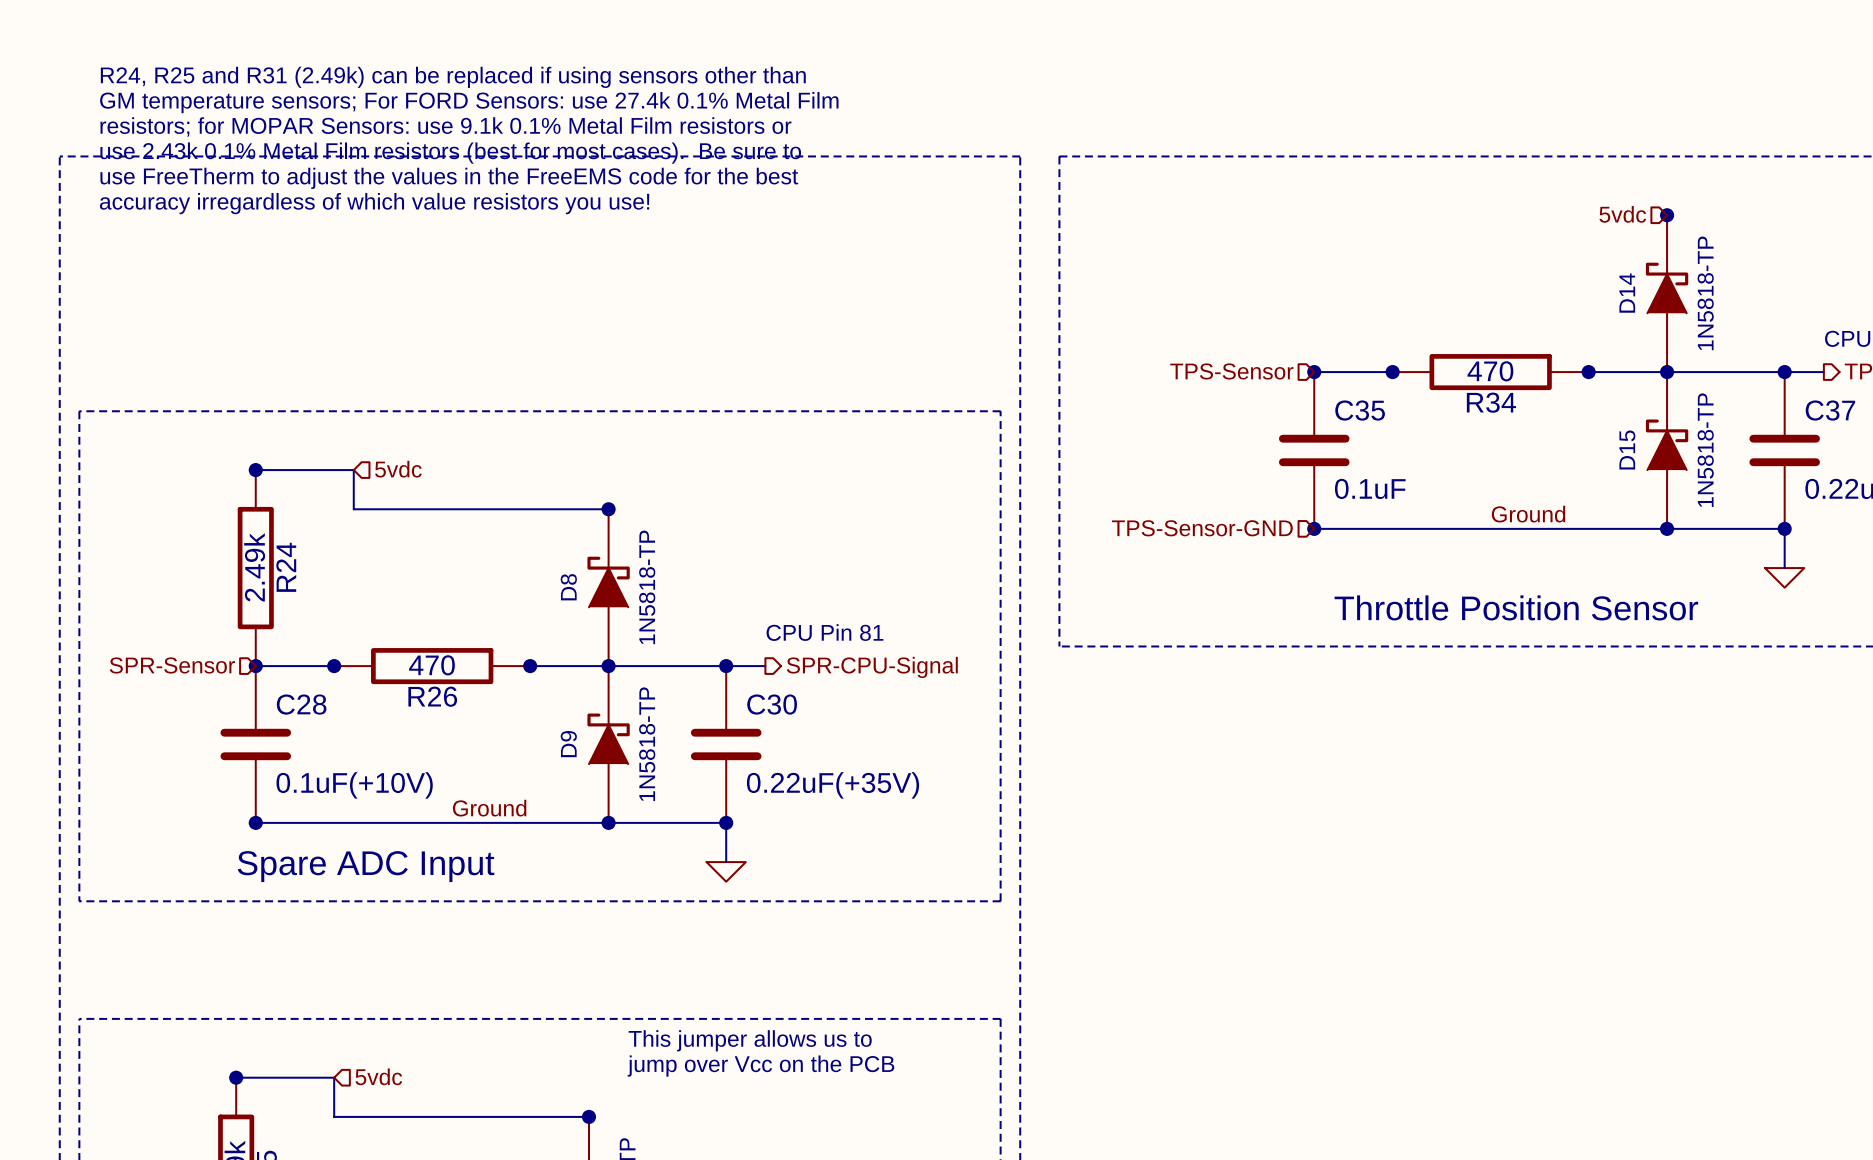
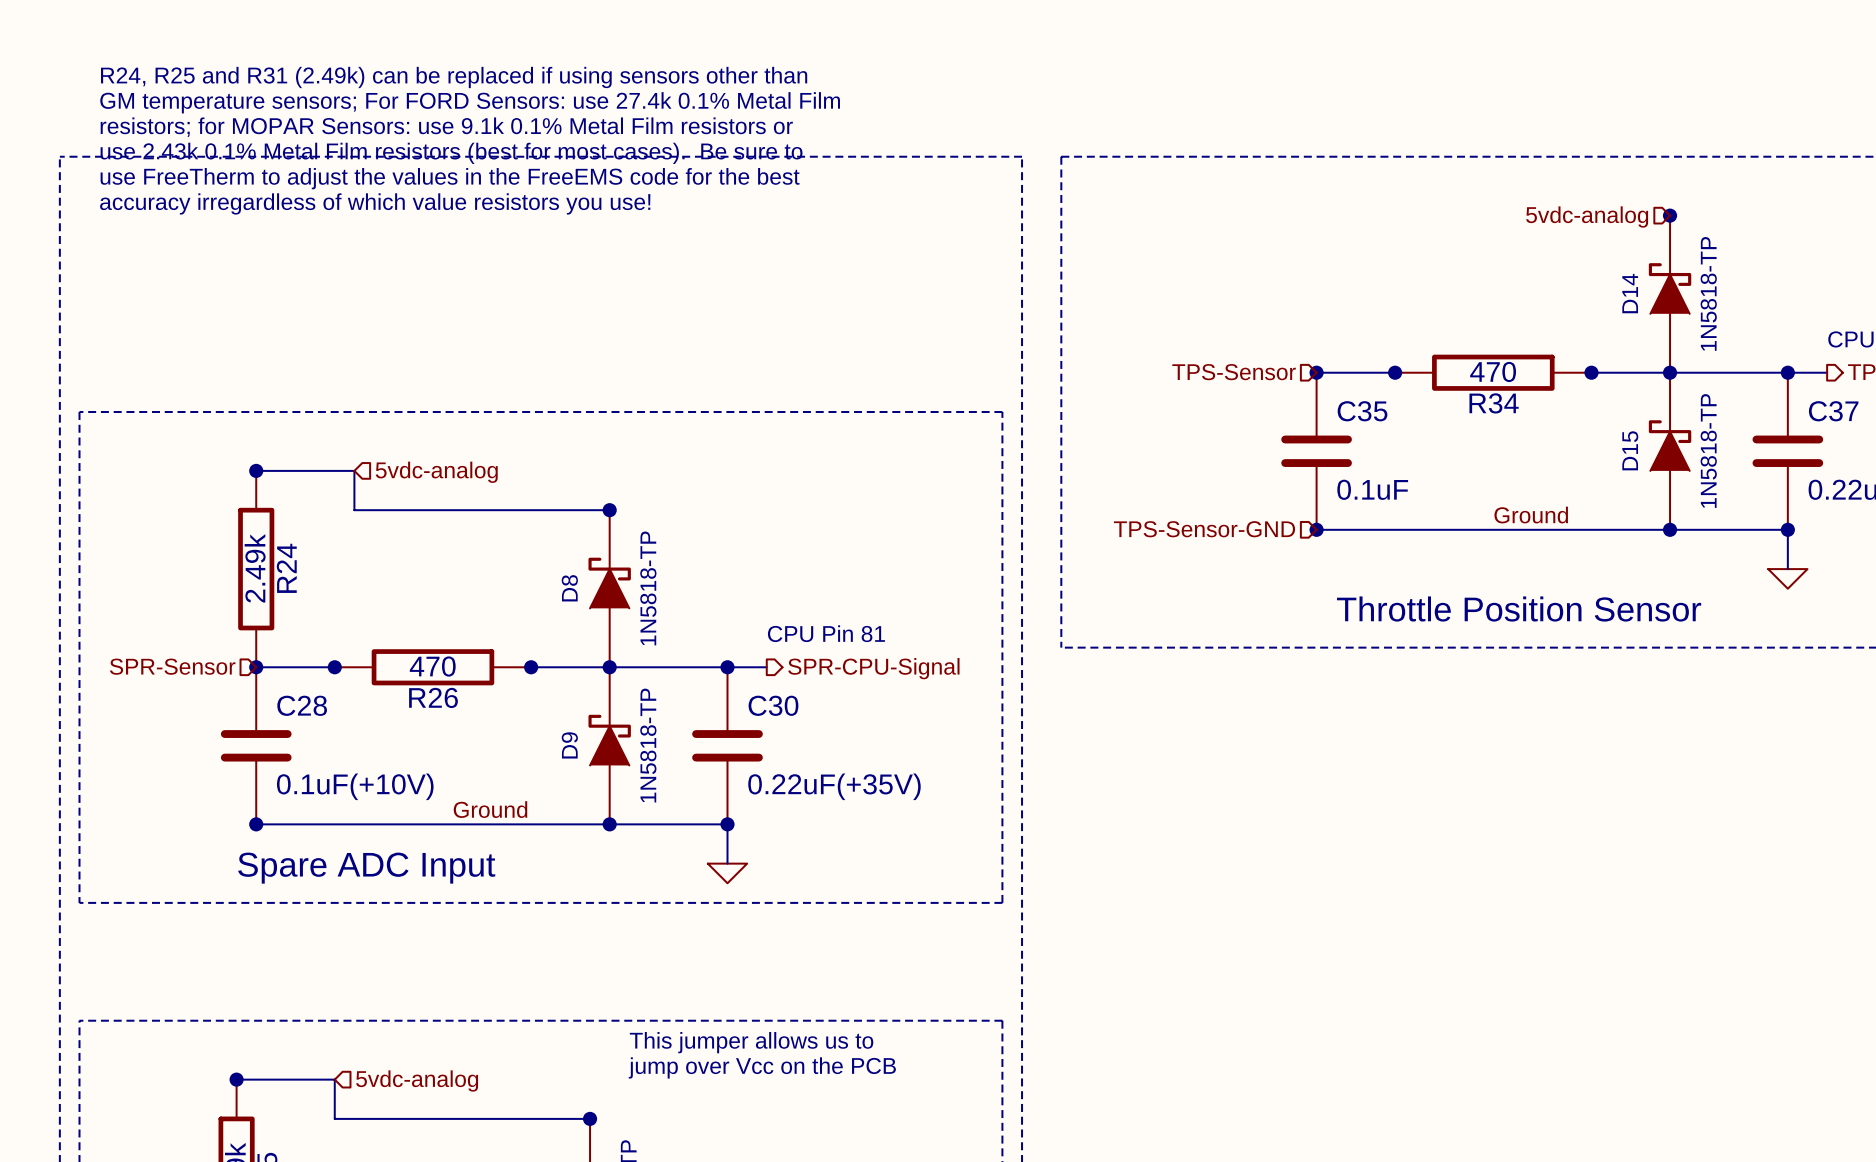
hierarchical label: 5vdc (1622, 214) -> 5vdc-analog (1587, 217)
hierarchical label: 5vdc (398, 469) -> 5vdc-analog (436, 472)
hierarchical label: 5vdc (378, 1076) -> 5vdc-analog (417, 1080)

